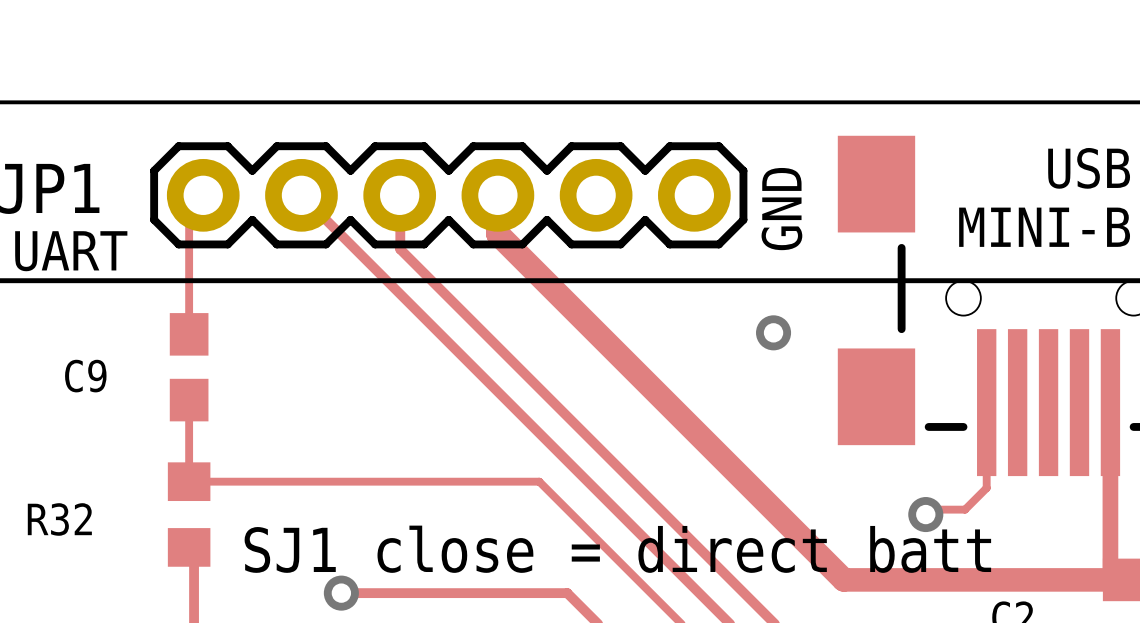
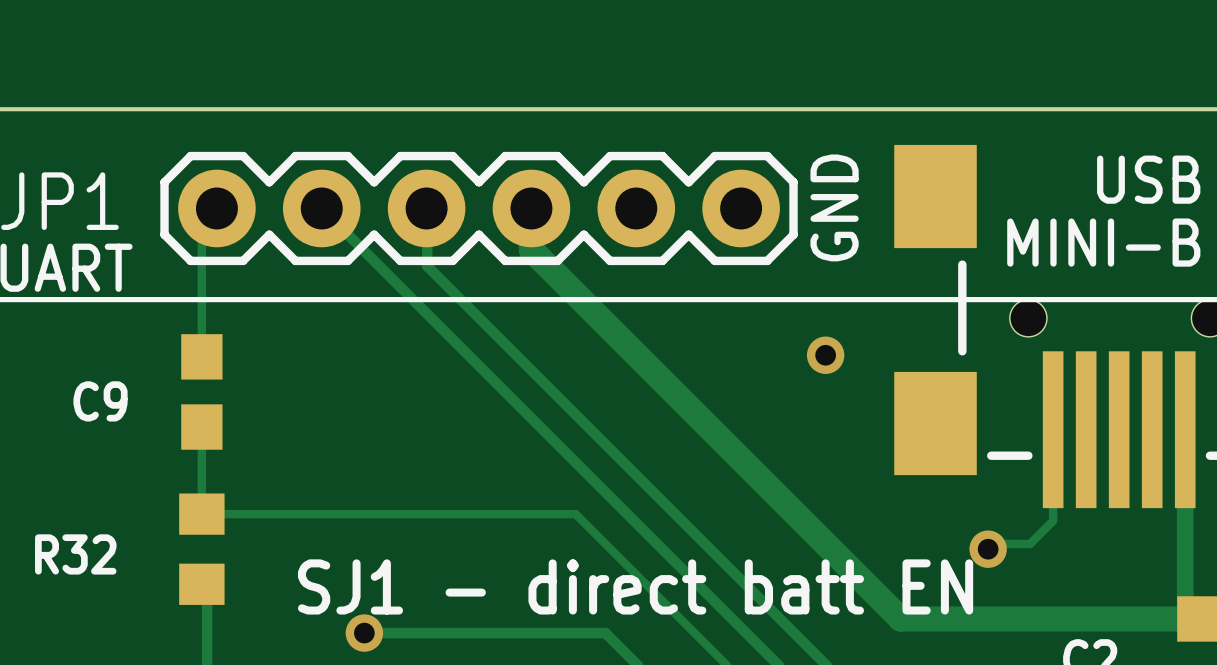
text: SJ1 close = direct batt (617, 549) -> SJ1 - direct batt EN (635, 586)

